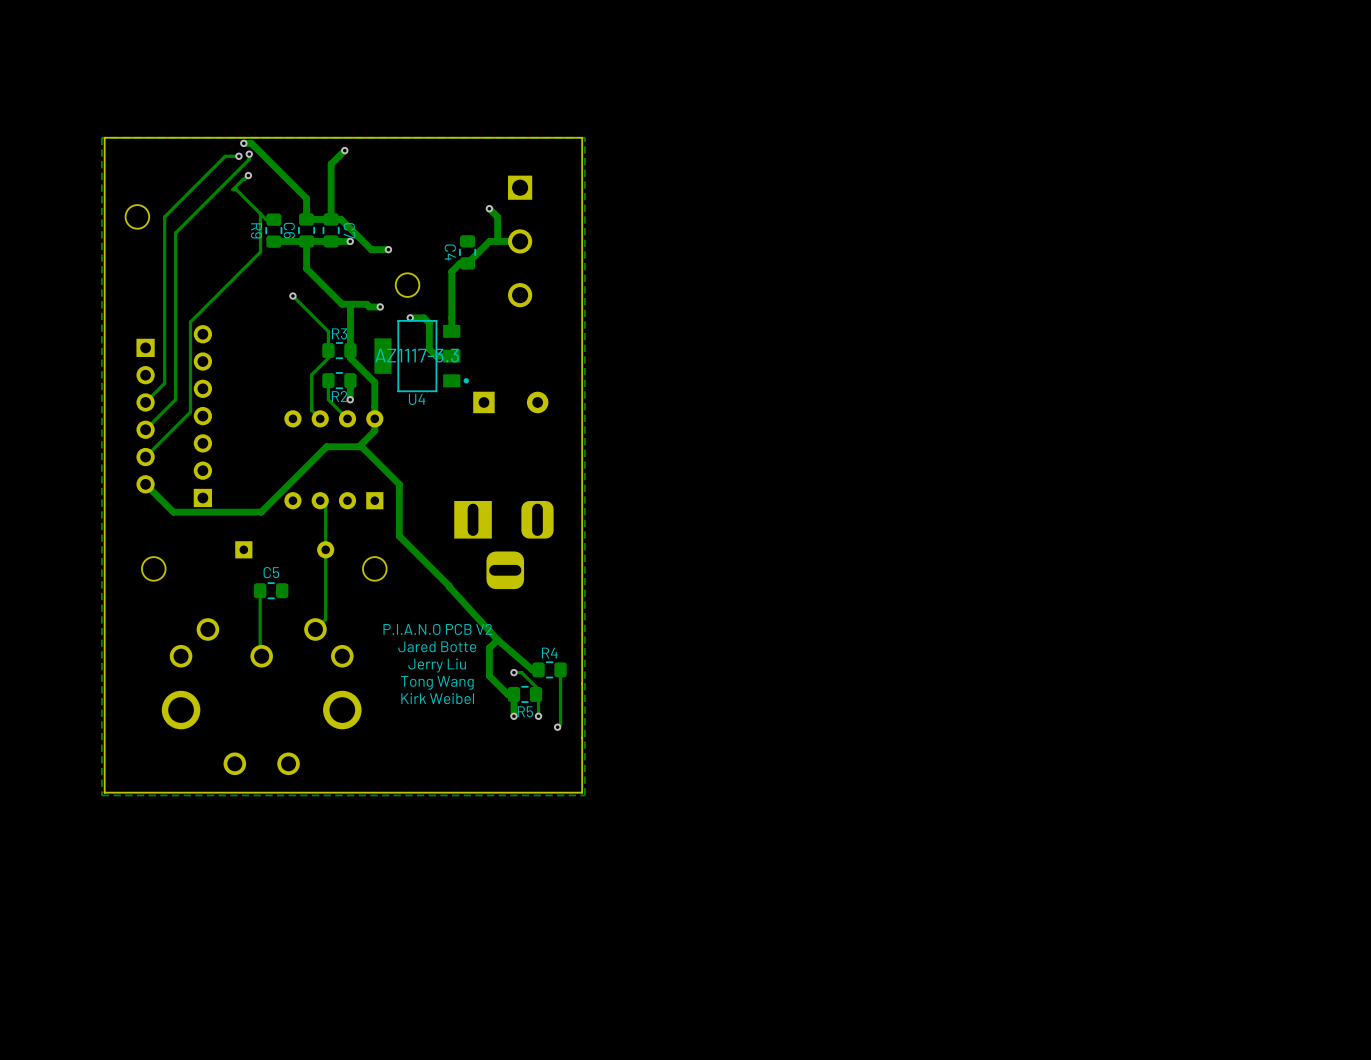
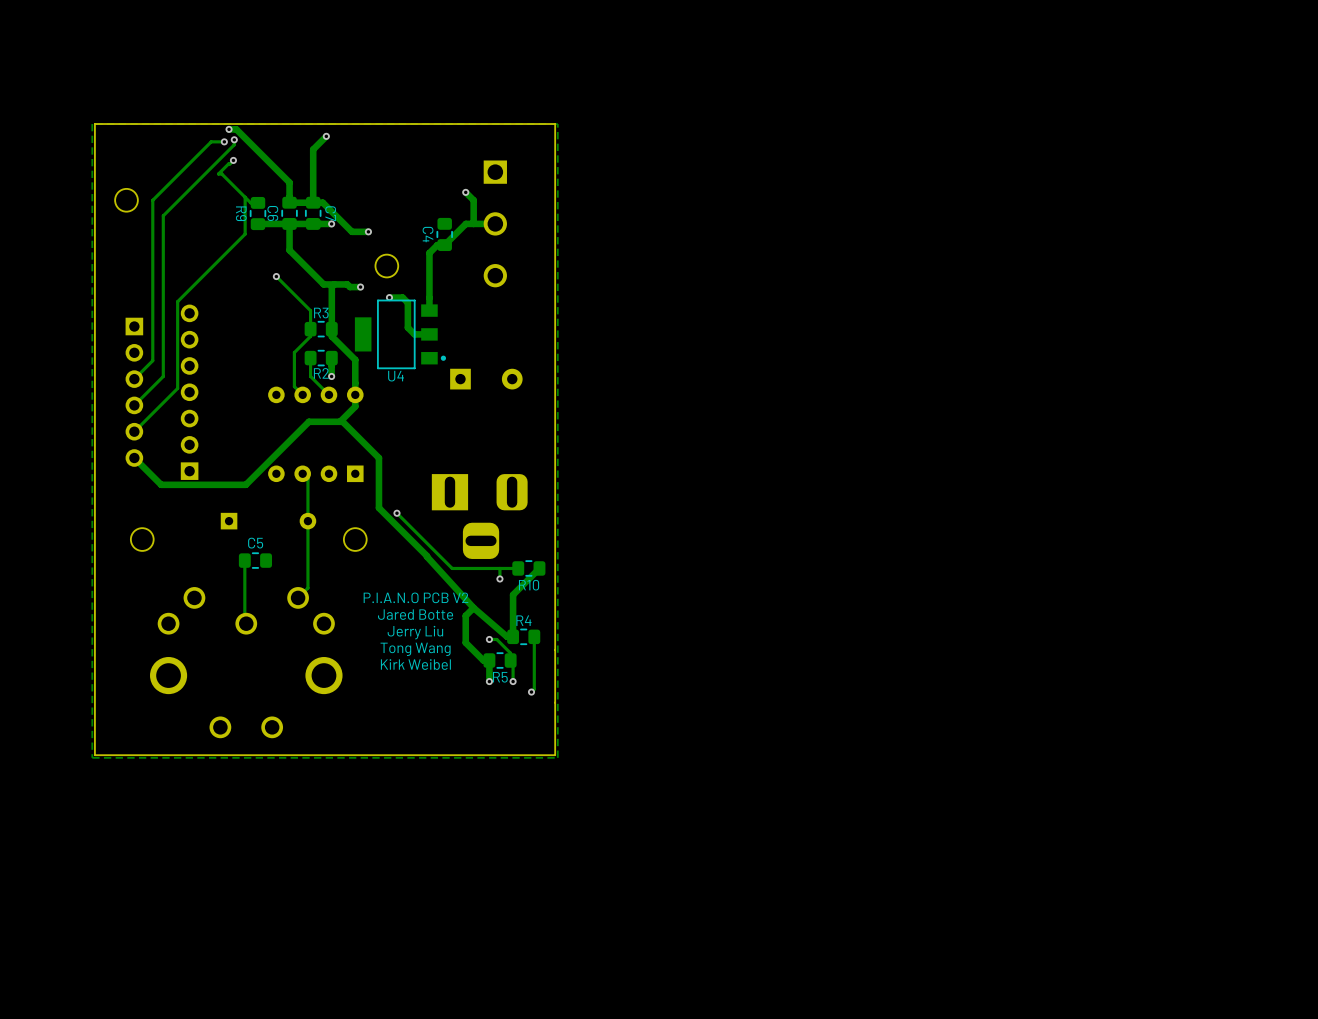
U4 value: AZ1117-3.3 (417, 355) -> none
track: none -> (396, 513) (452, 568) (518, 568)
via: none -> (396, 513)
track: none -> (499, 568) (499, 578)
R10: none -> (528, 568)
track: none -> (539, 568) (513, 594) (513, 636)
via: none -> (499, 578)

